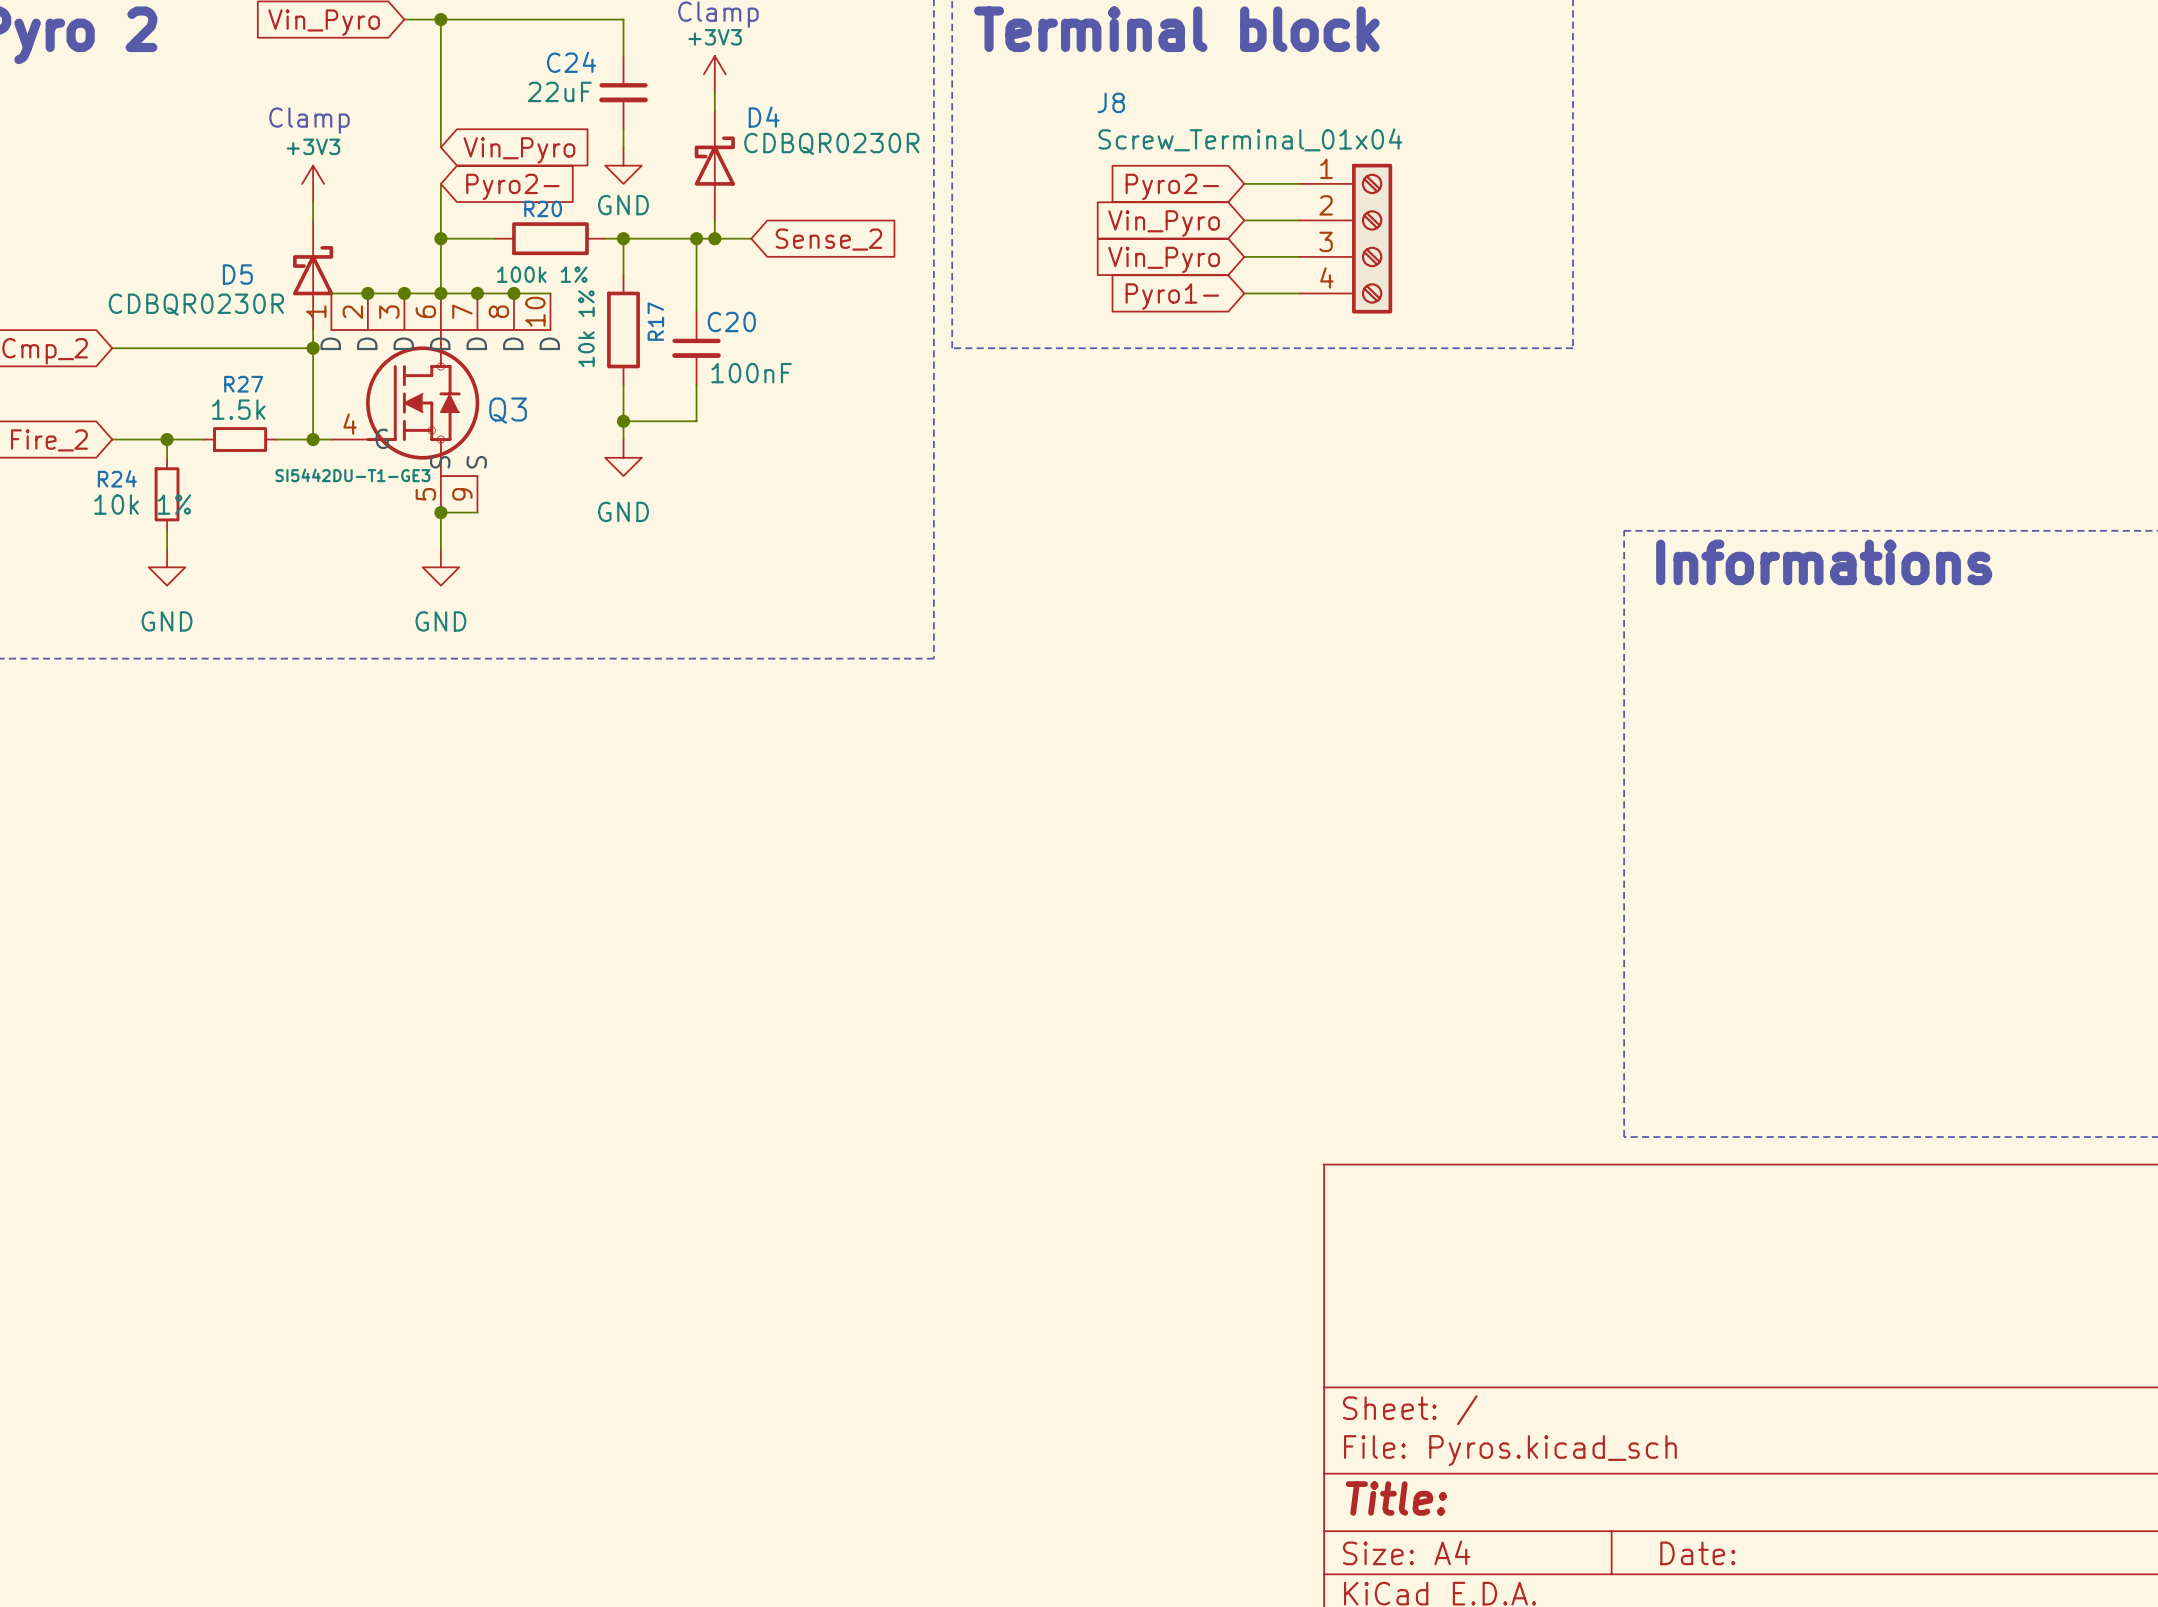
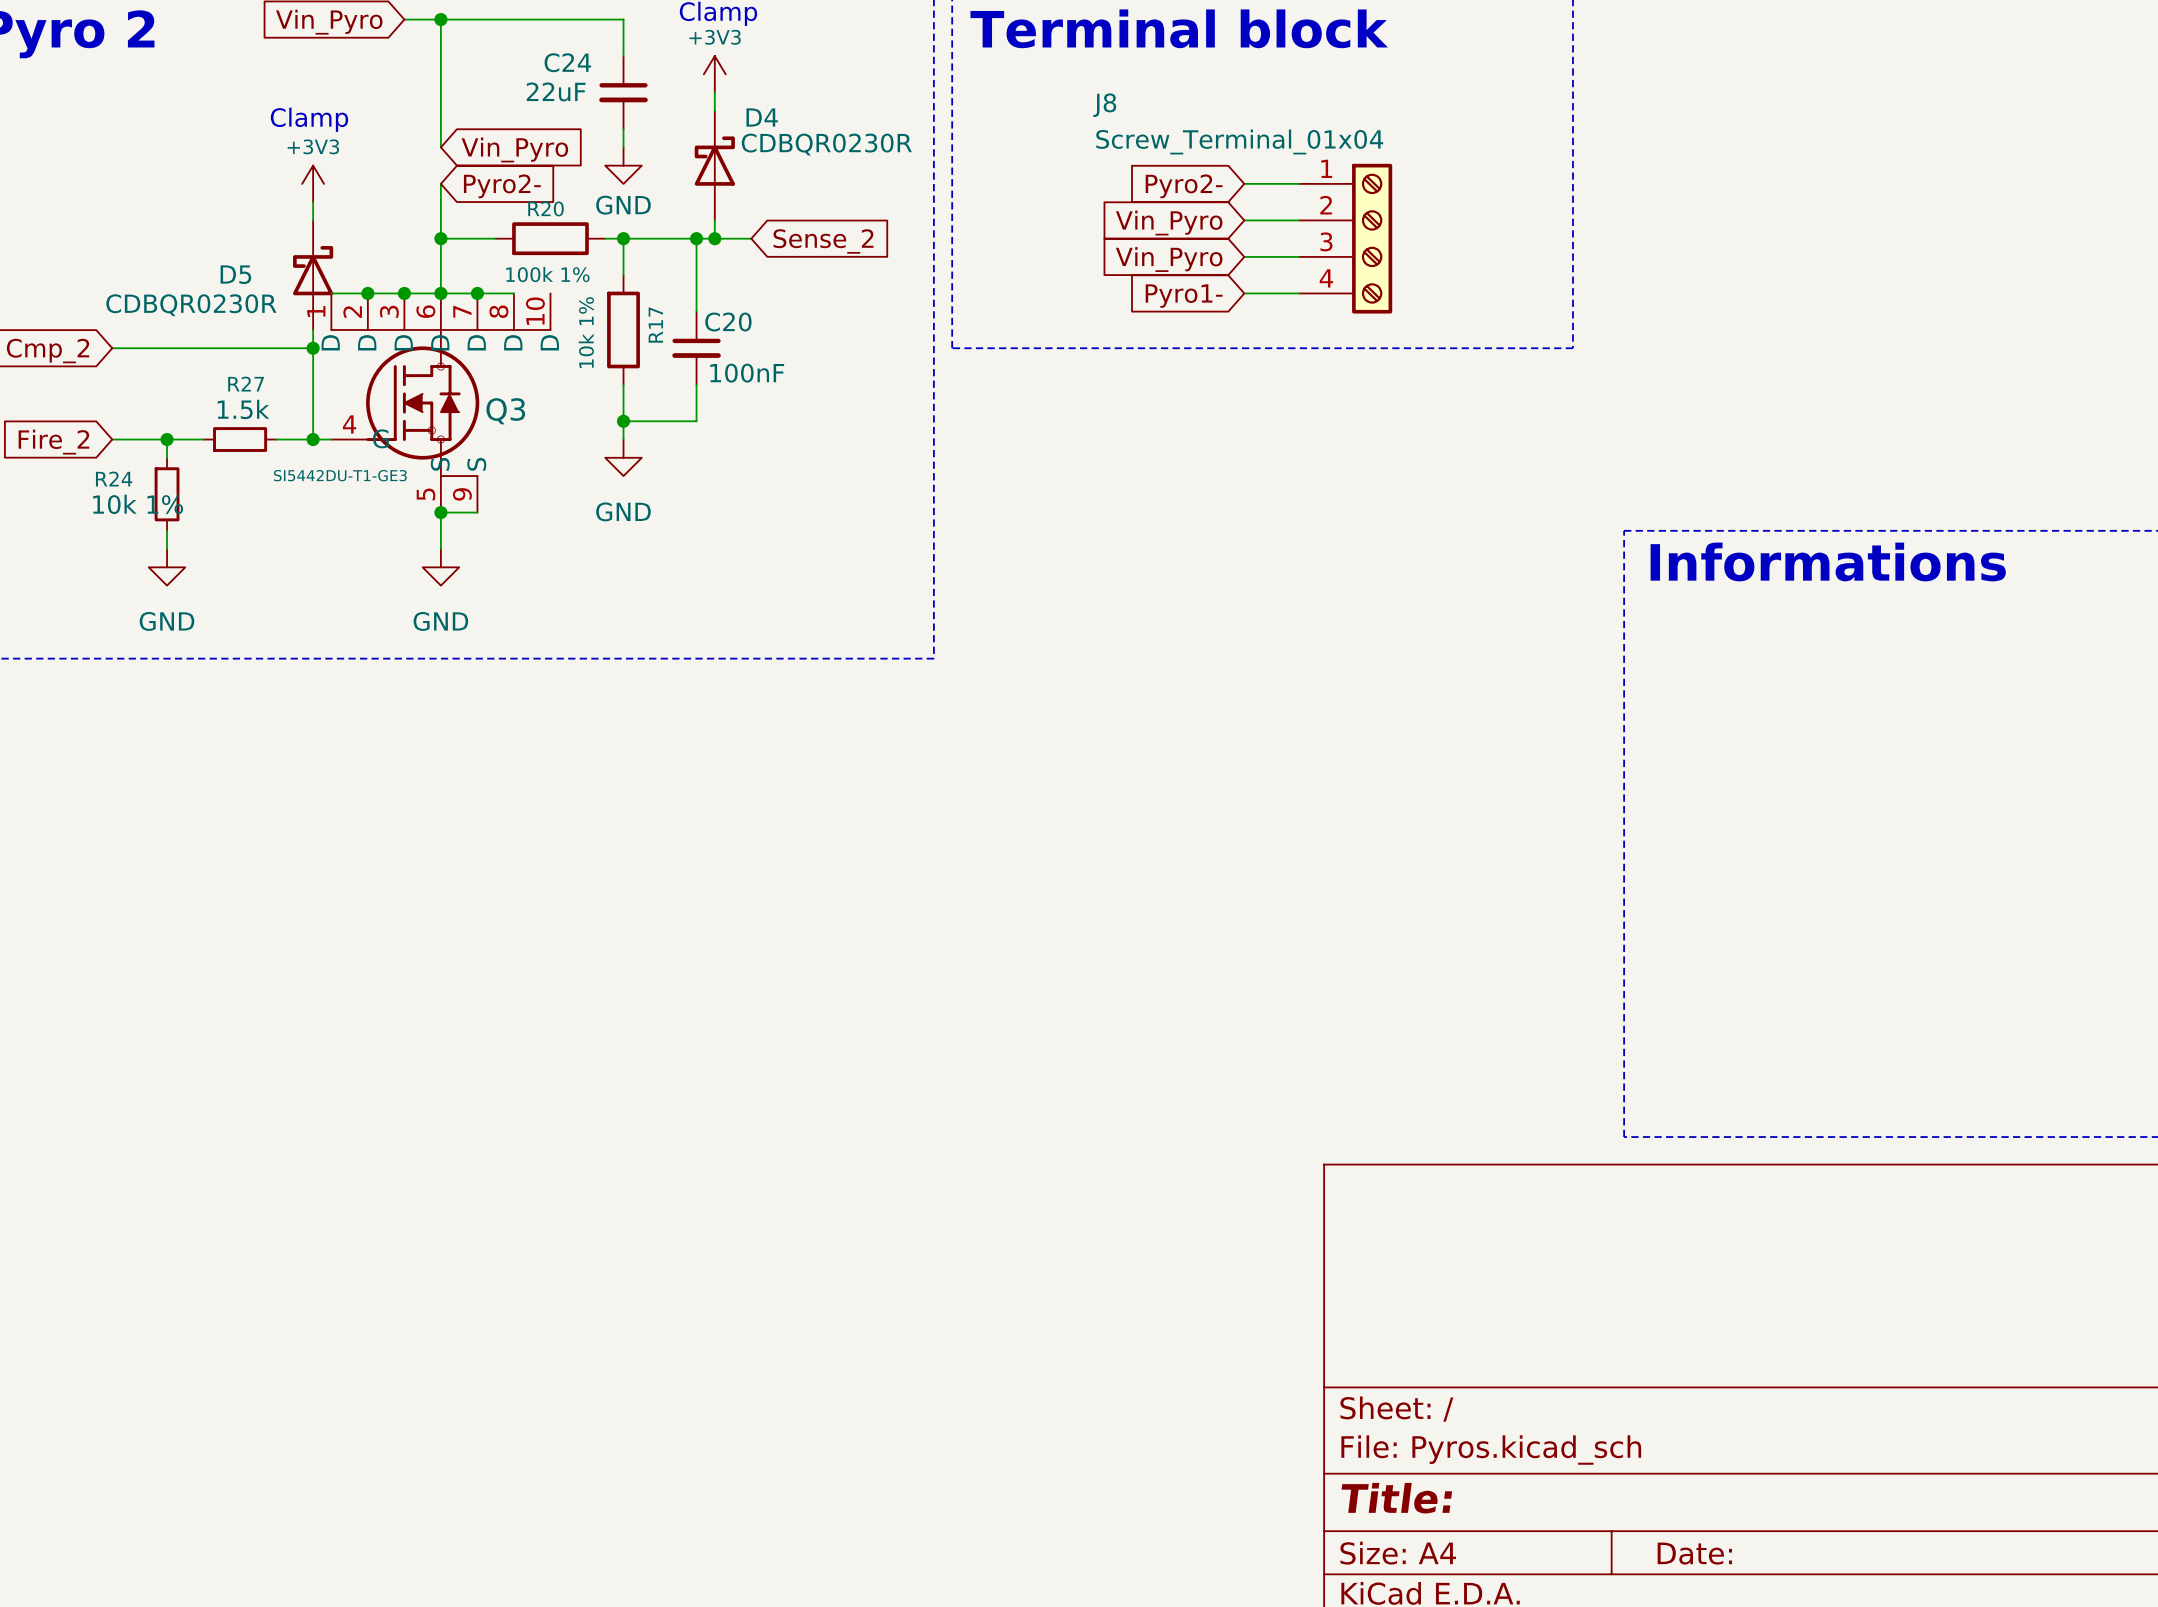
wire: (513, 293) (550, 293) -> none
junction: (513, 293) -> none

